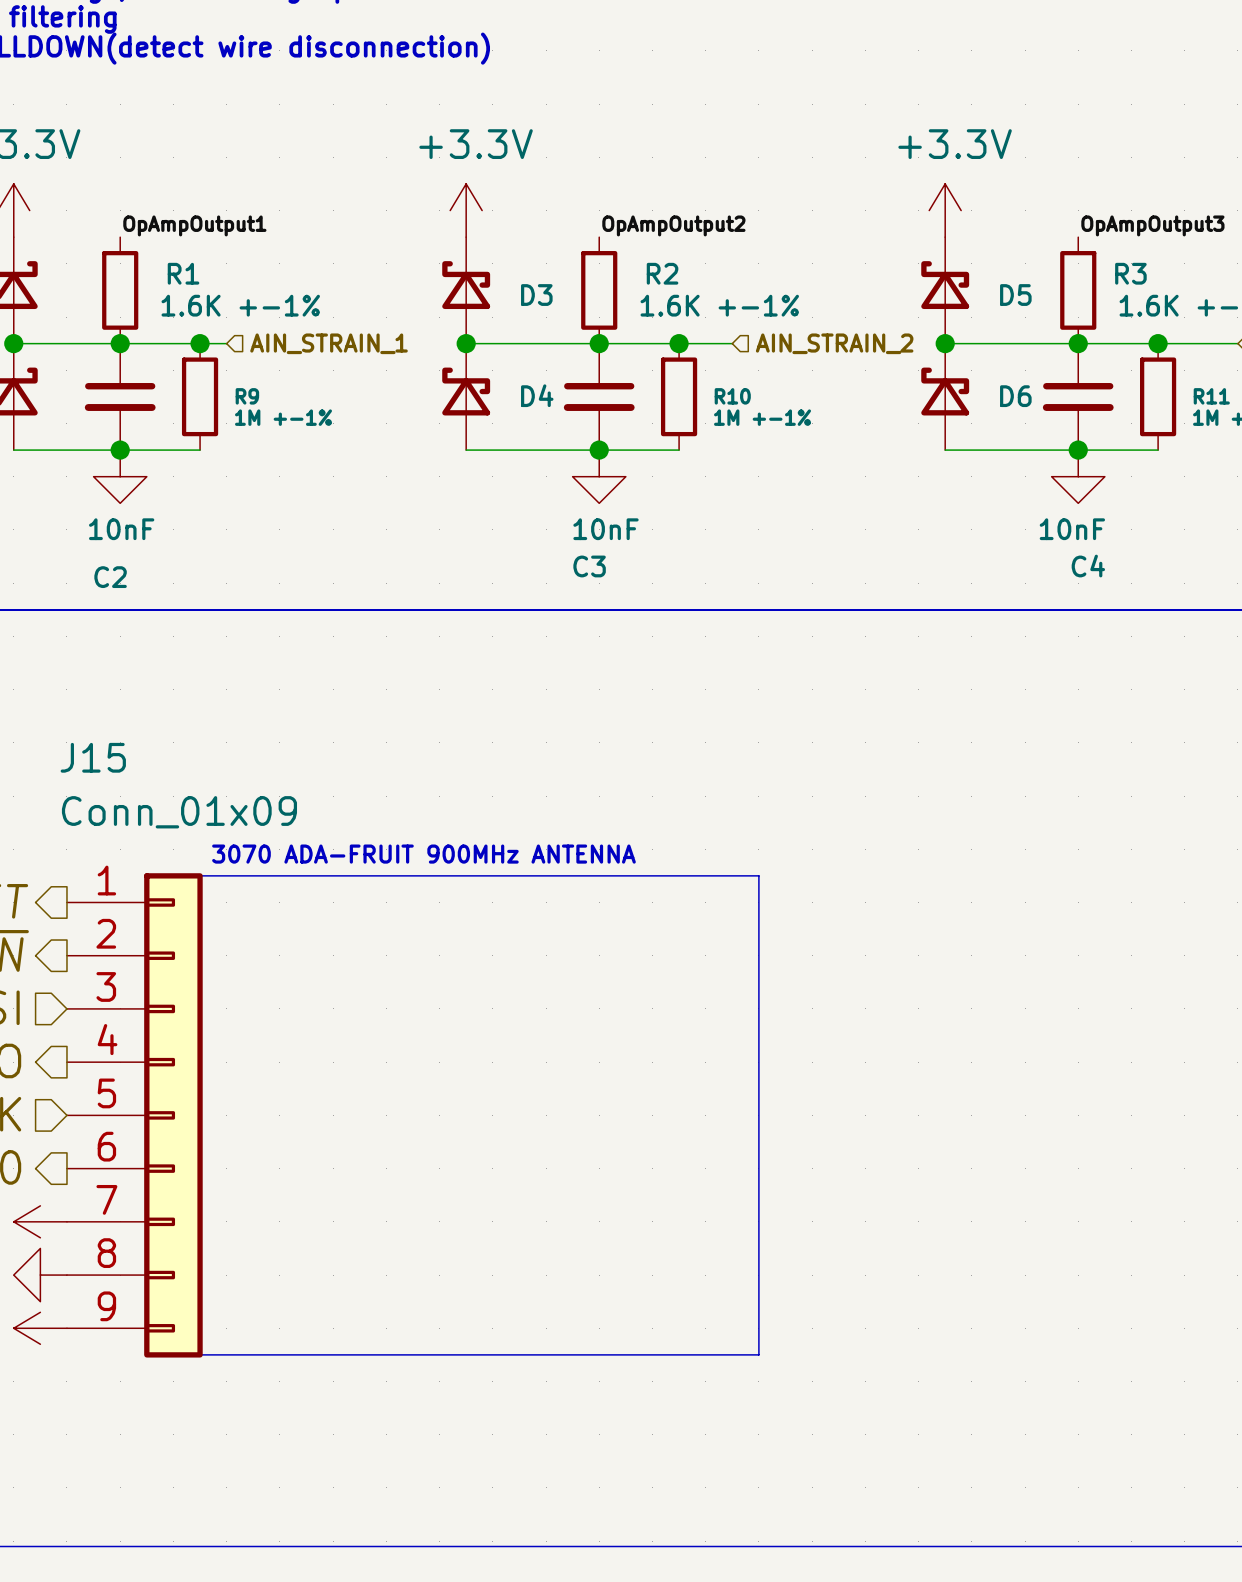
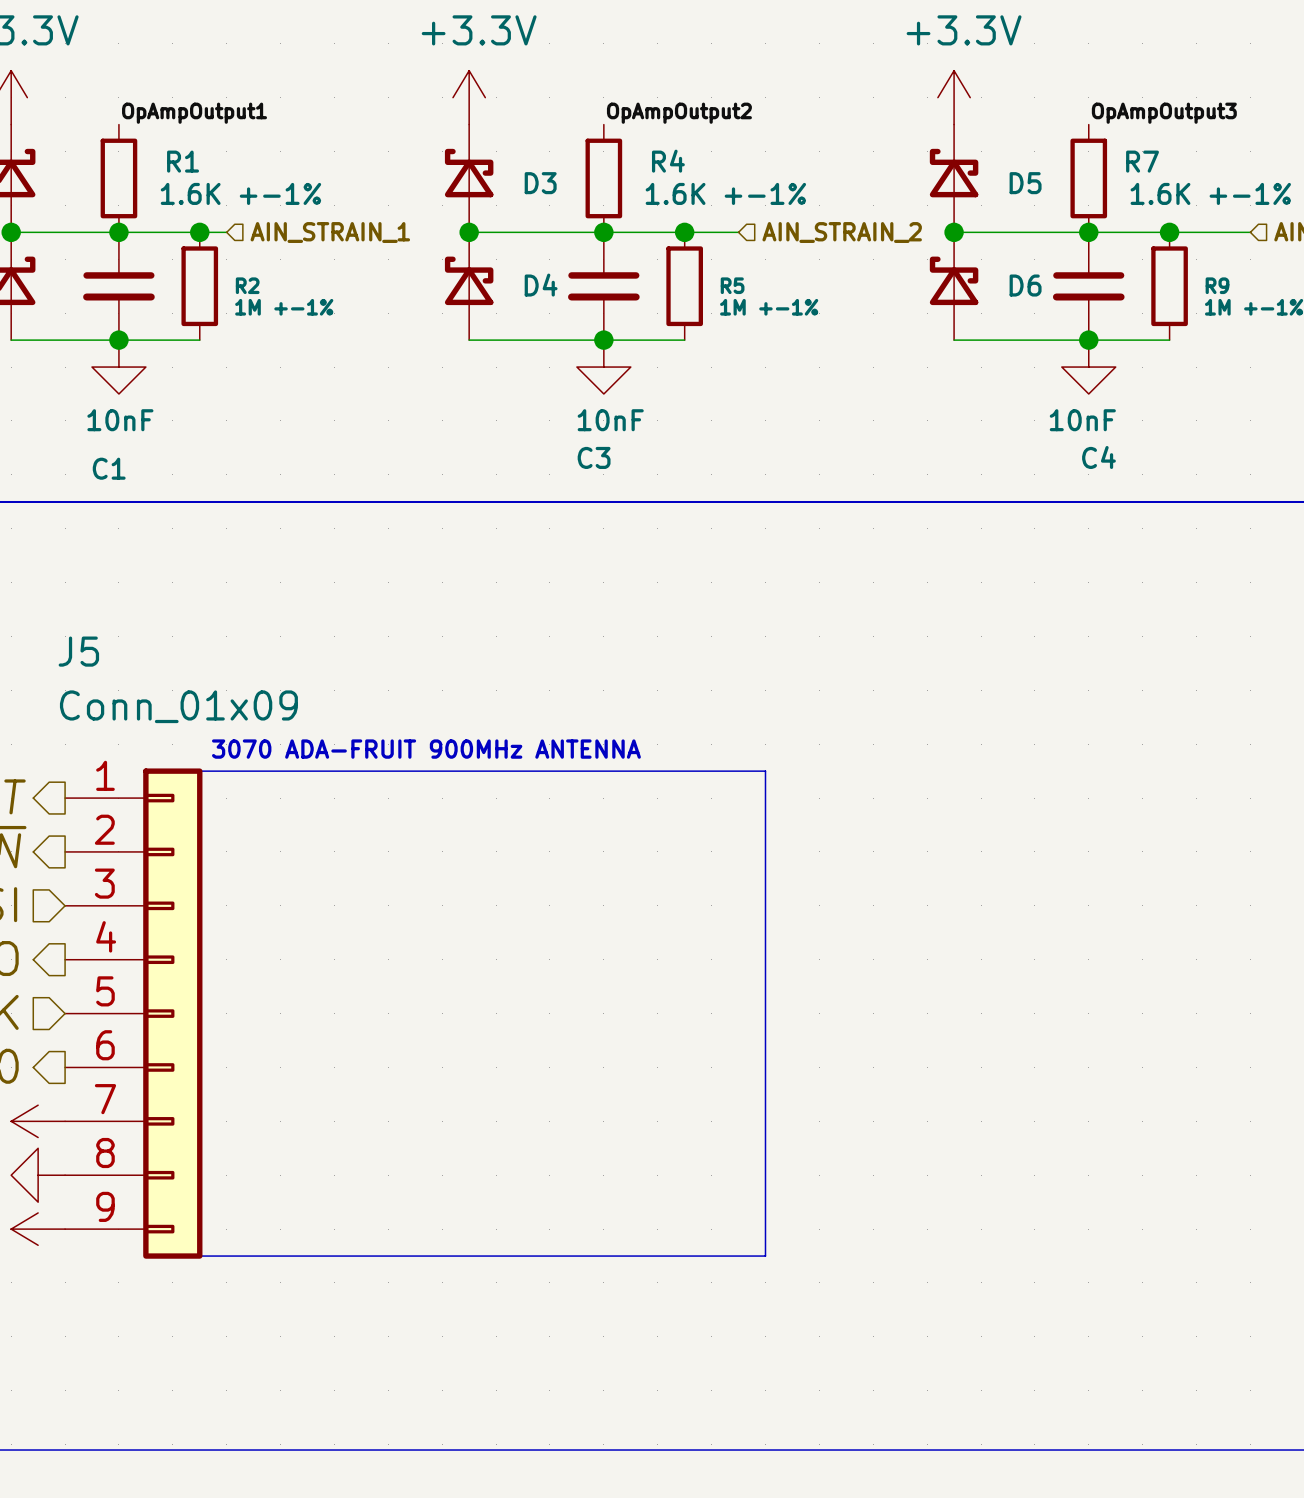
R2 name: R2 (662, 273) -> R4 (668, 161)
R3 name: R3 (1130, 273) -> R7 (1142, 161)
R9 name: R9 (247, 396) -> R2 (247, 285)
R10 name: R10 (732, 396) -> R5 (732, 285)
R11 name: R11 (1211, 396) -> R9 (1217, 285)
C2 name: C2 (110, 577) -> C1 (109, 468)
J15 name: J15 (93, 757) -> J5 (78, 651)

